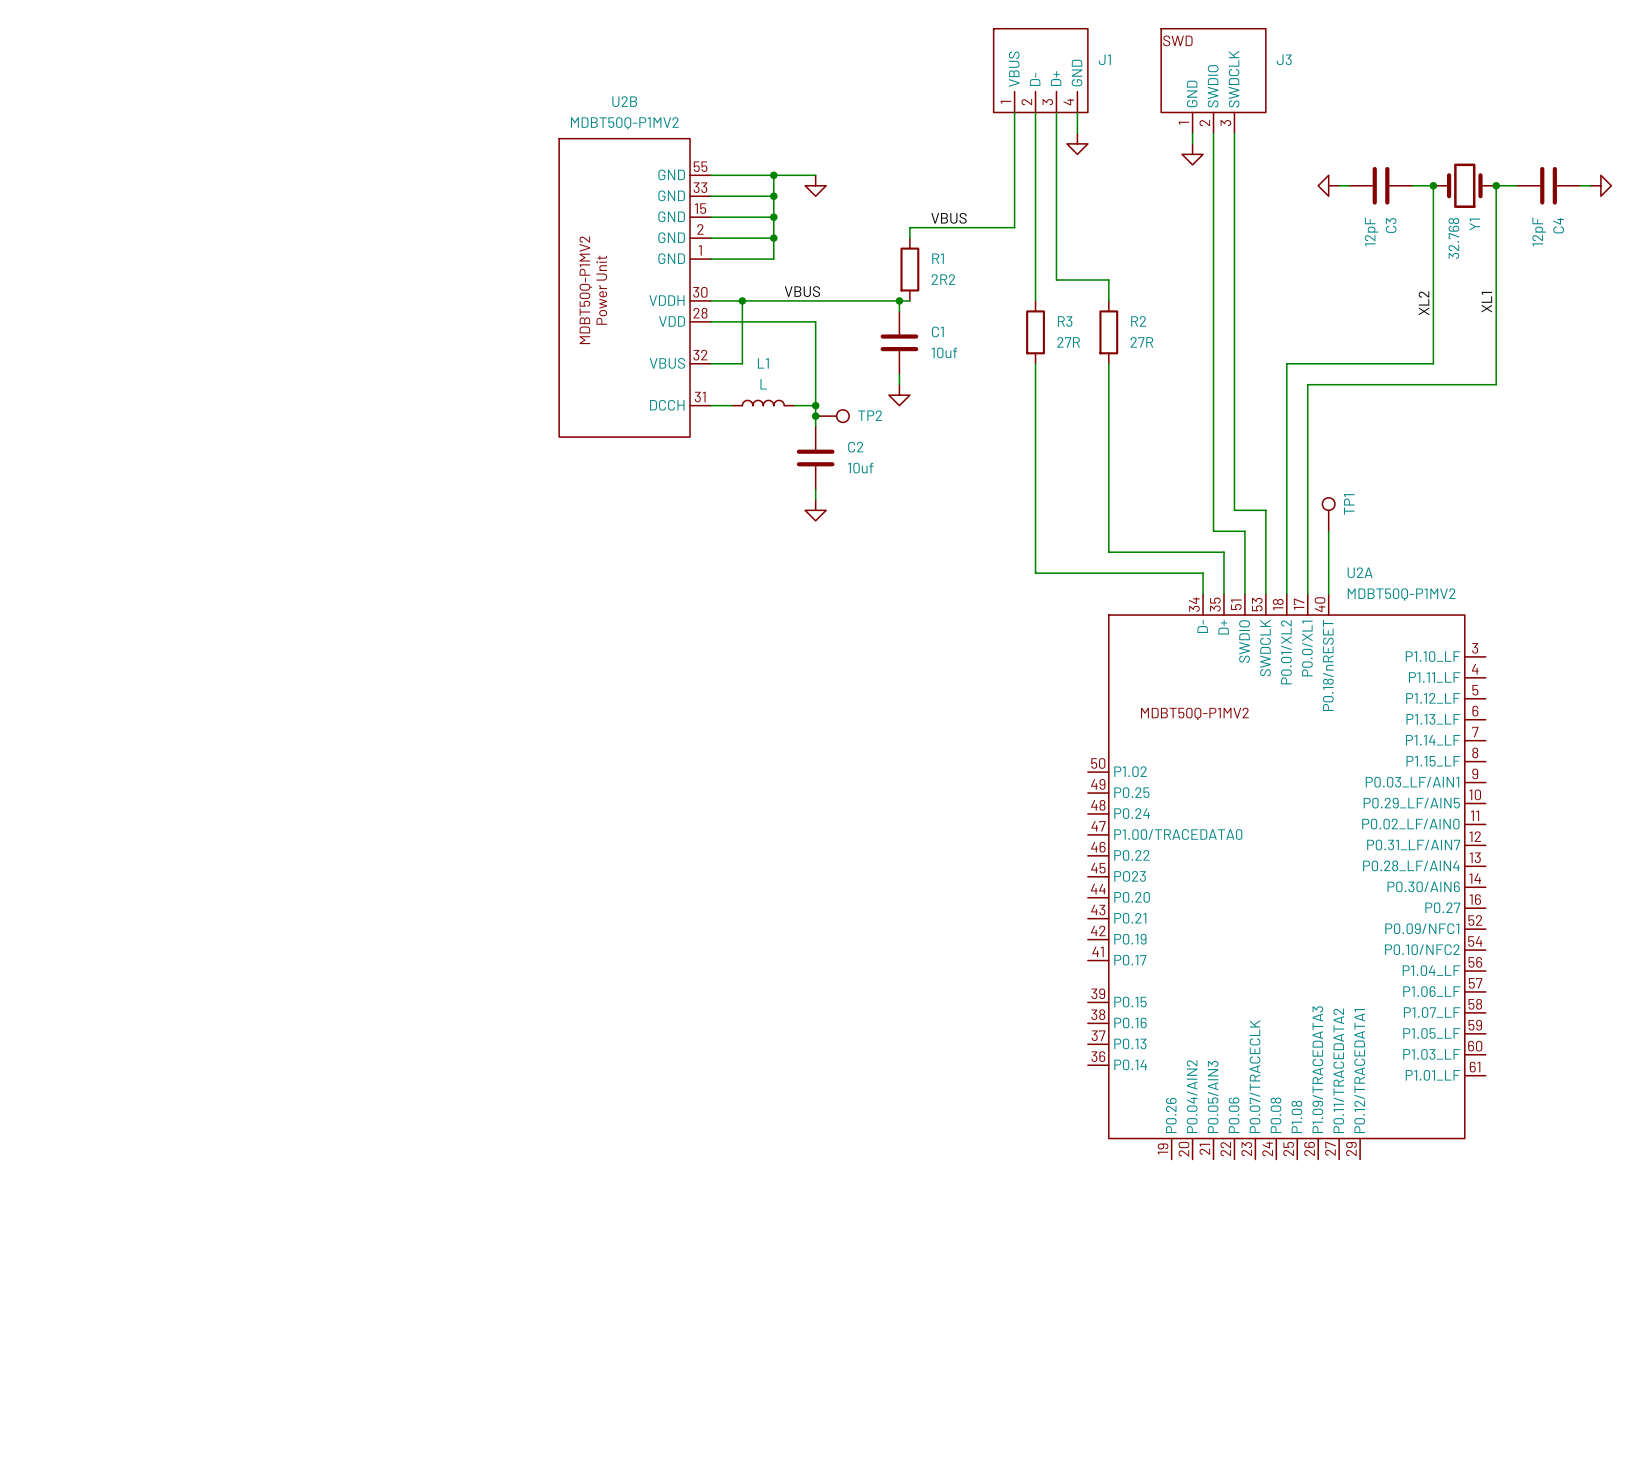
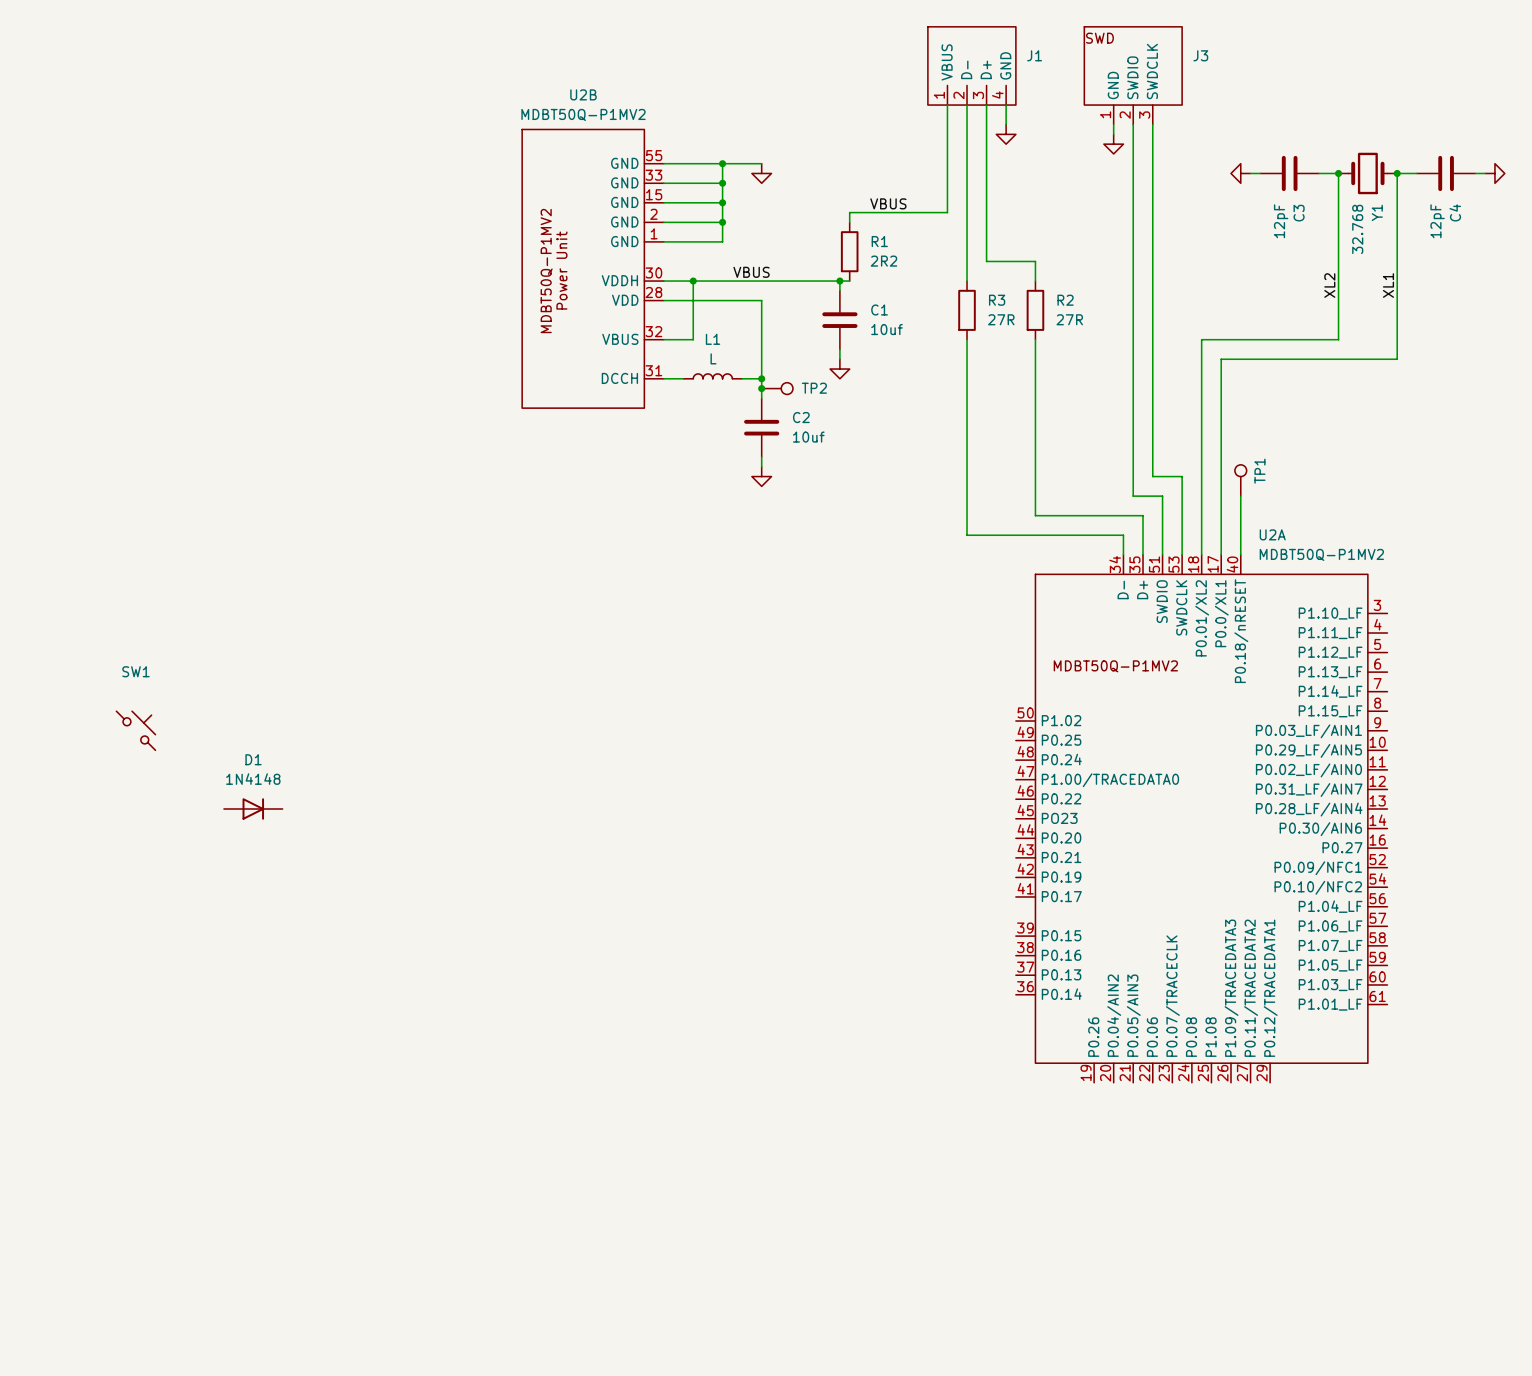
SW1: none -> (135, 730)
D1: none -> 1N4148 (253, 808)

